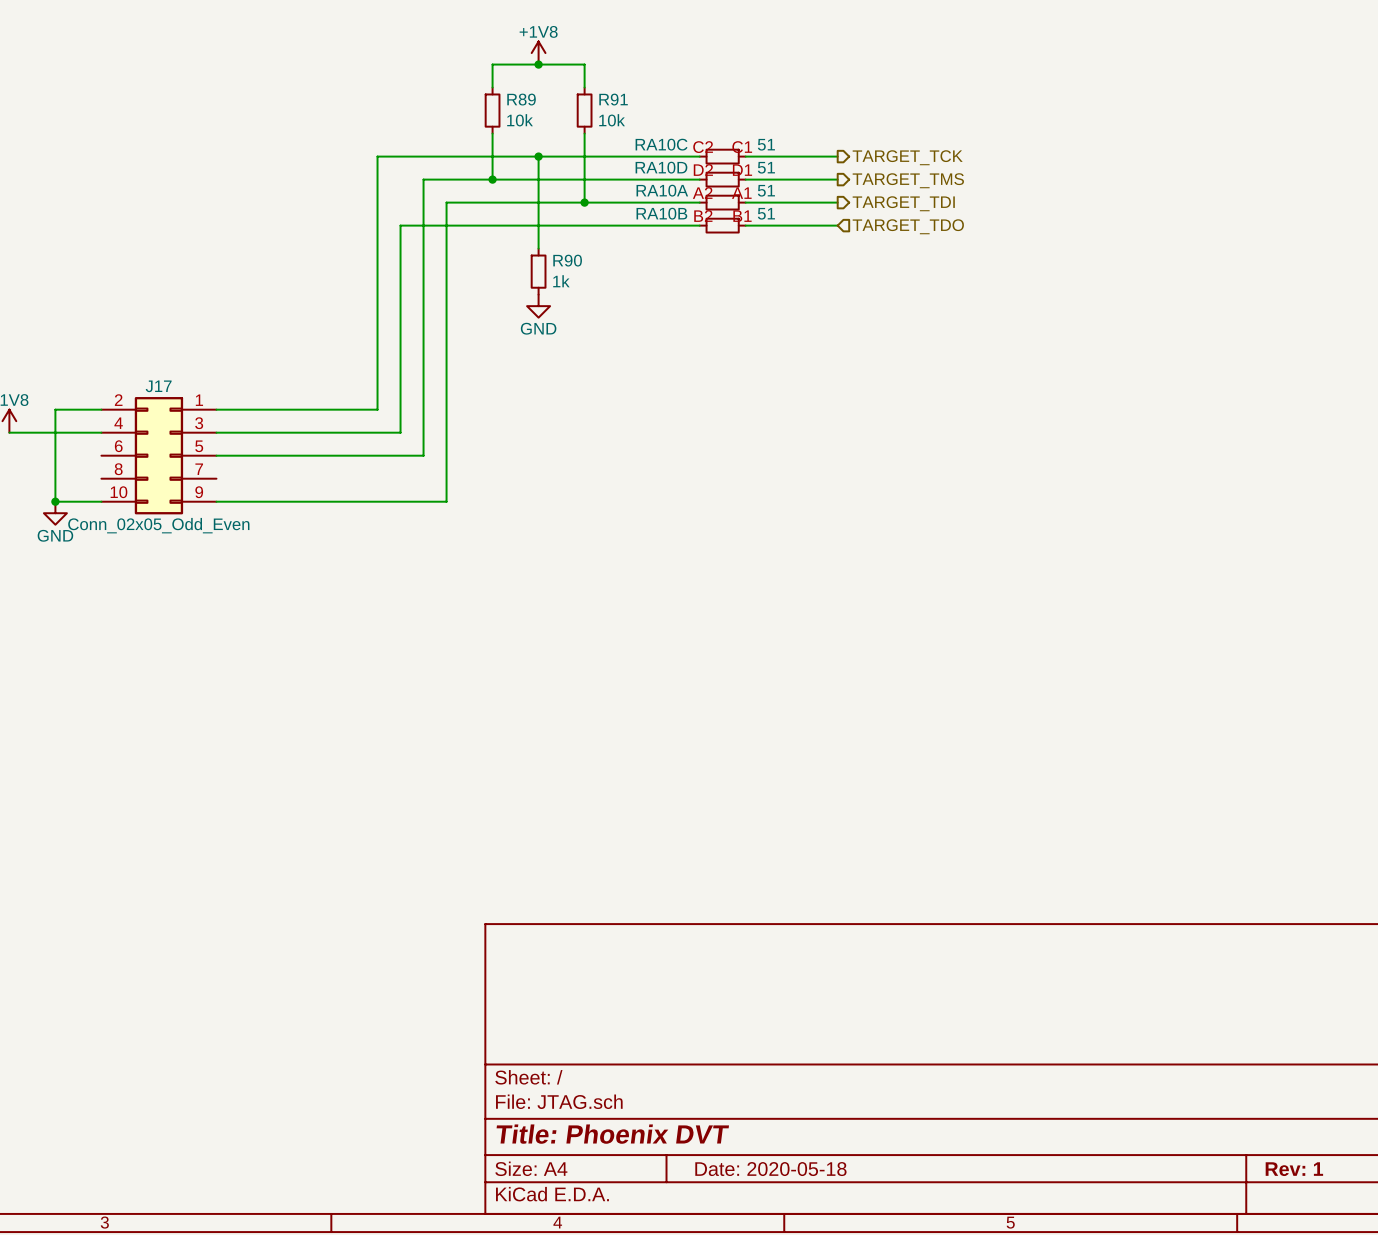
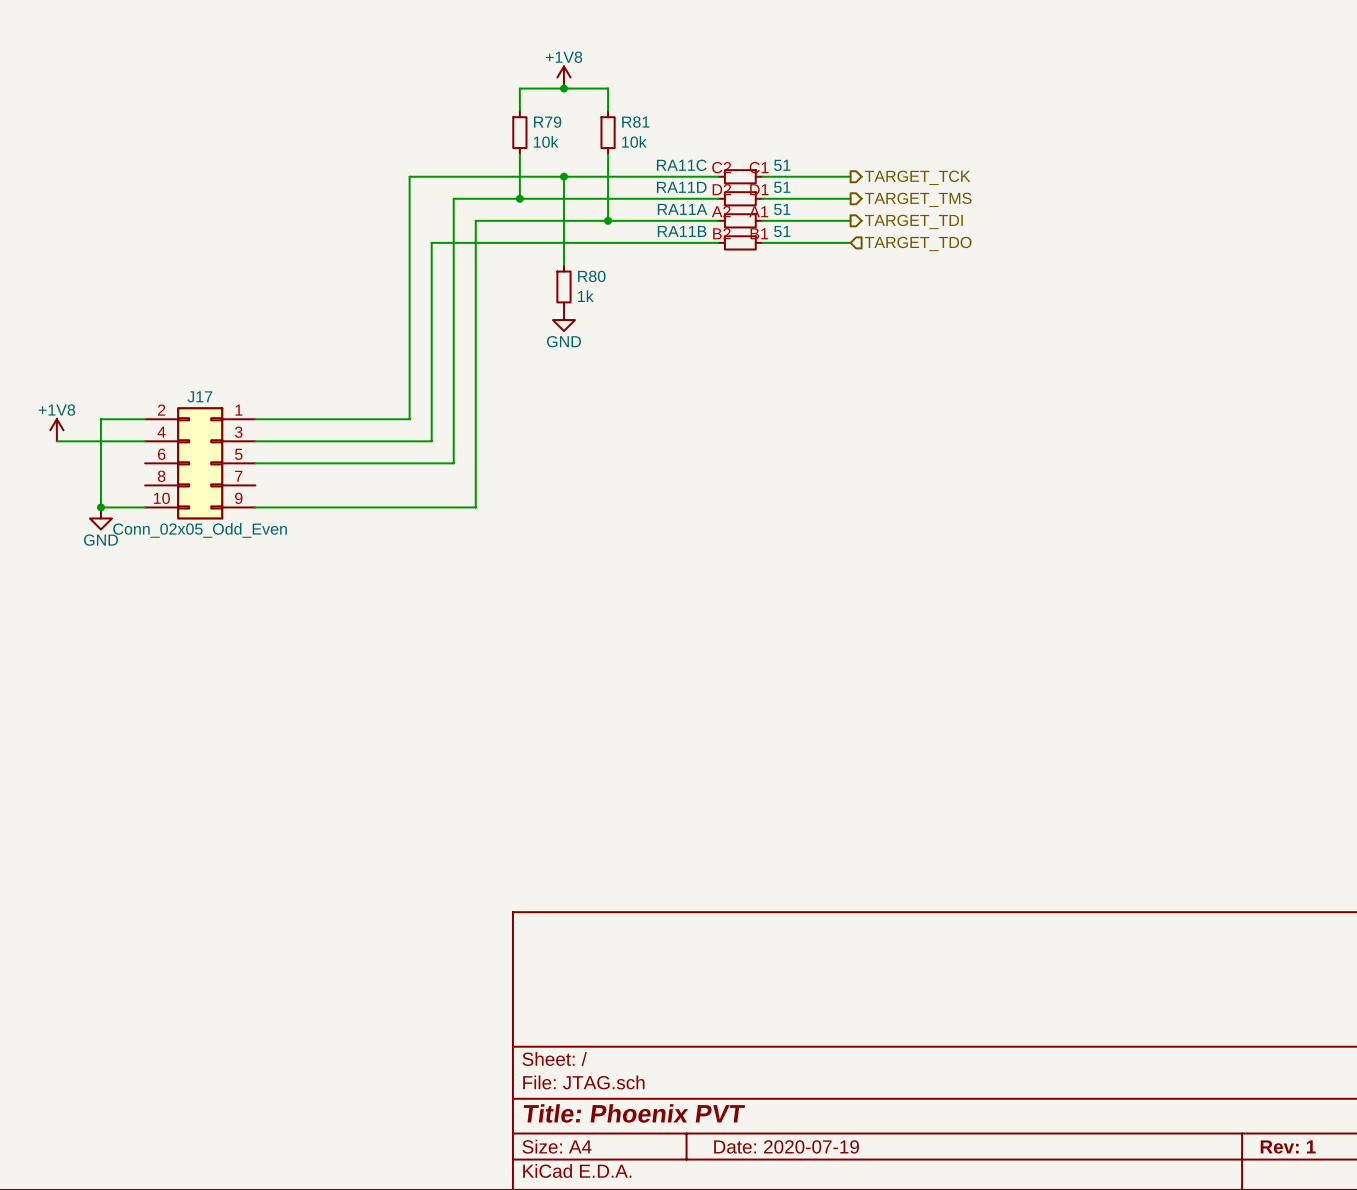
R89 name: R89 (521, 99) -> R79 (547, 122)
R91 name: R91 (613, 99) -> R81 (635, 122)
RA10C name: RA10C (661, 144) -> RA11C (681, 165)
RA10D name: RA10D (661, 167) -> RA11D (681, 187)
RA10A name: RA10A (662, 190) -> RA11A (682, 209)
RA10B name: RA10B (661, 213) -> RA11B (682, 231)
R90 name: R90 (567, 260) -> R80 (591, 276)
title block: Title: Phoenix DVT (612, 1134) -> Title: Phoenix PVT (634, 1113)
title block: Date: 2020-05-18 (770, 1169) -> Date: 2020-07-19 (786, 1146)

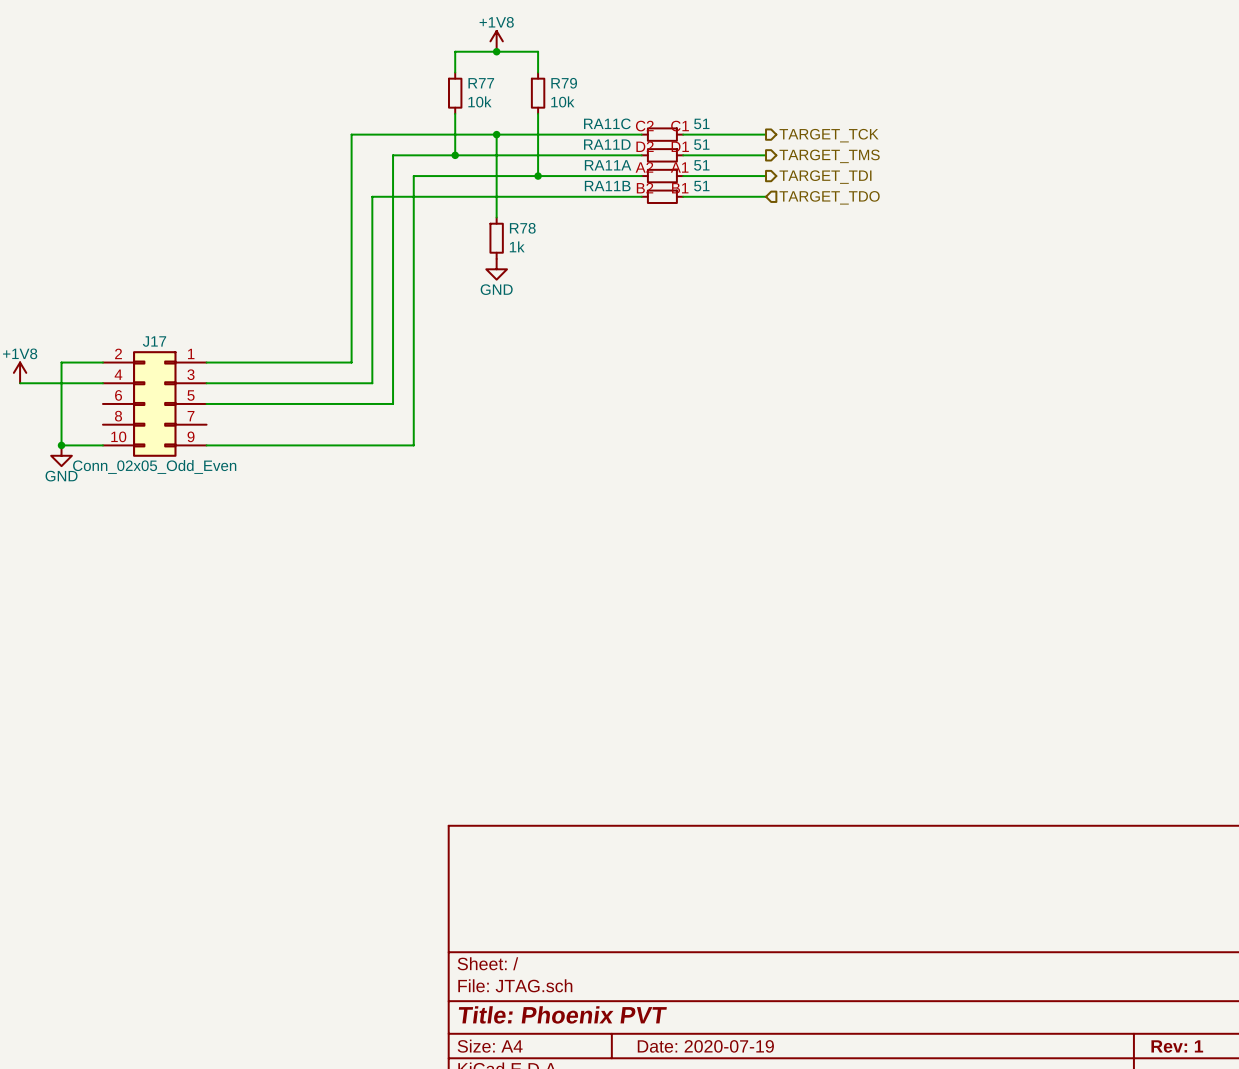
R79 name: R79 (547, 122) -> R77 (481, 83)
R81 name: R81 (635, 122) -> R79 (564, 83)
R80 name: R80 (591, 276) -> R78 (522, 228)

